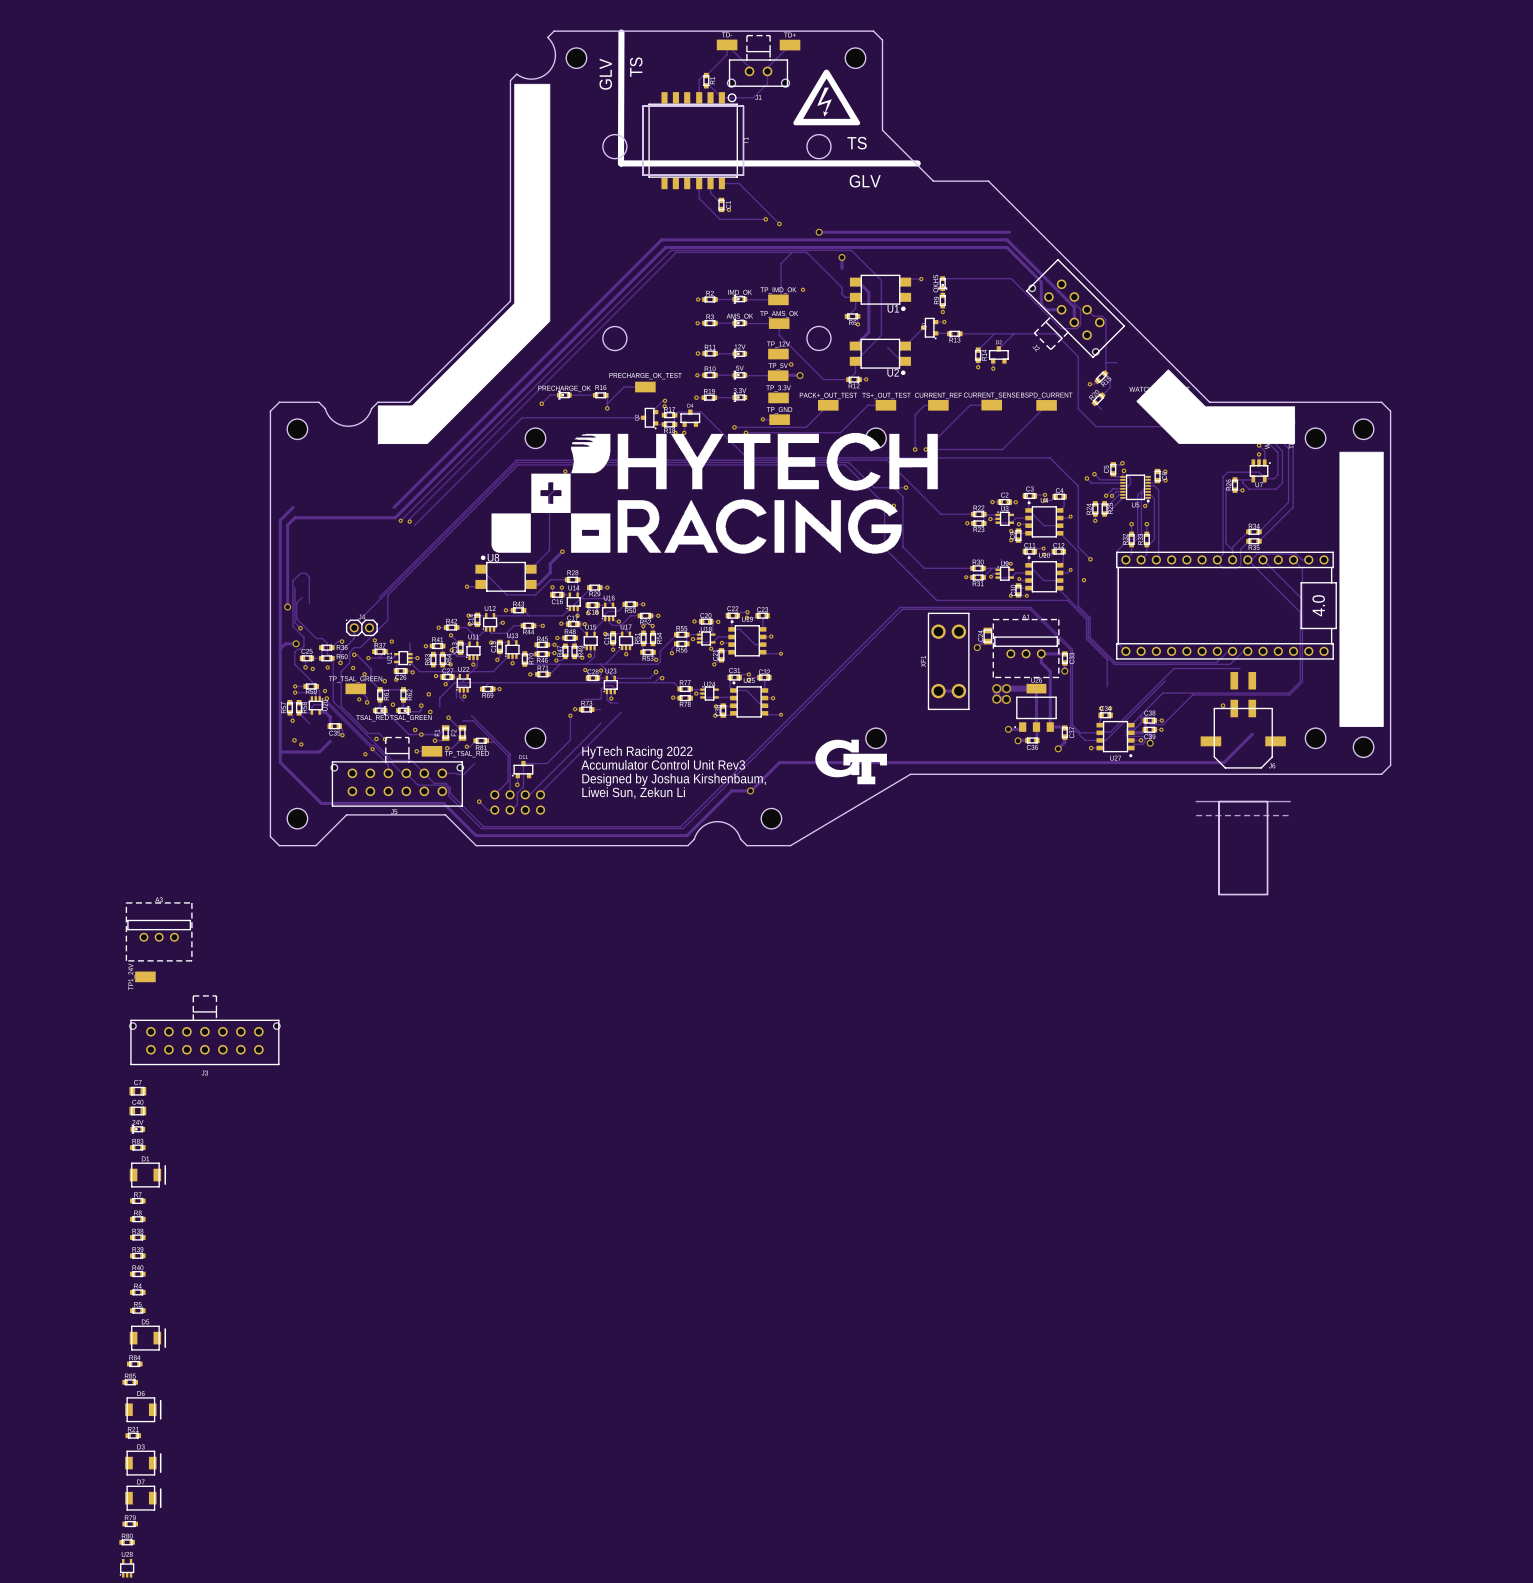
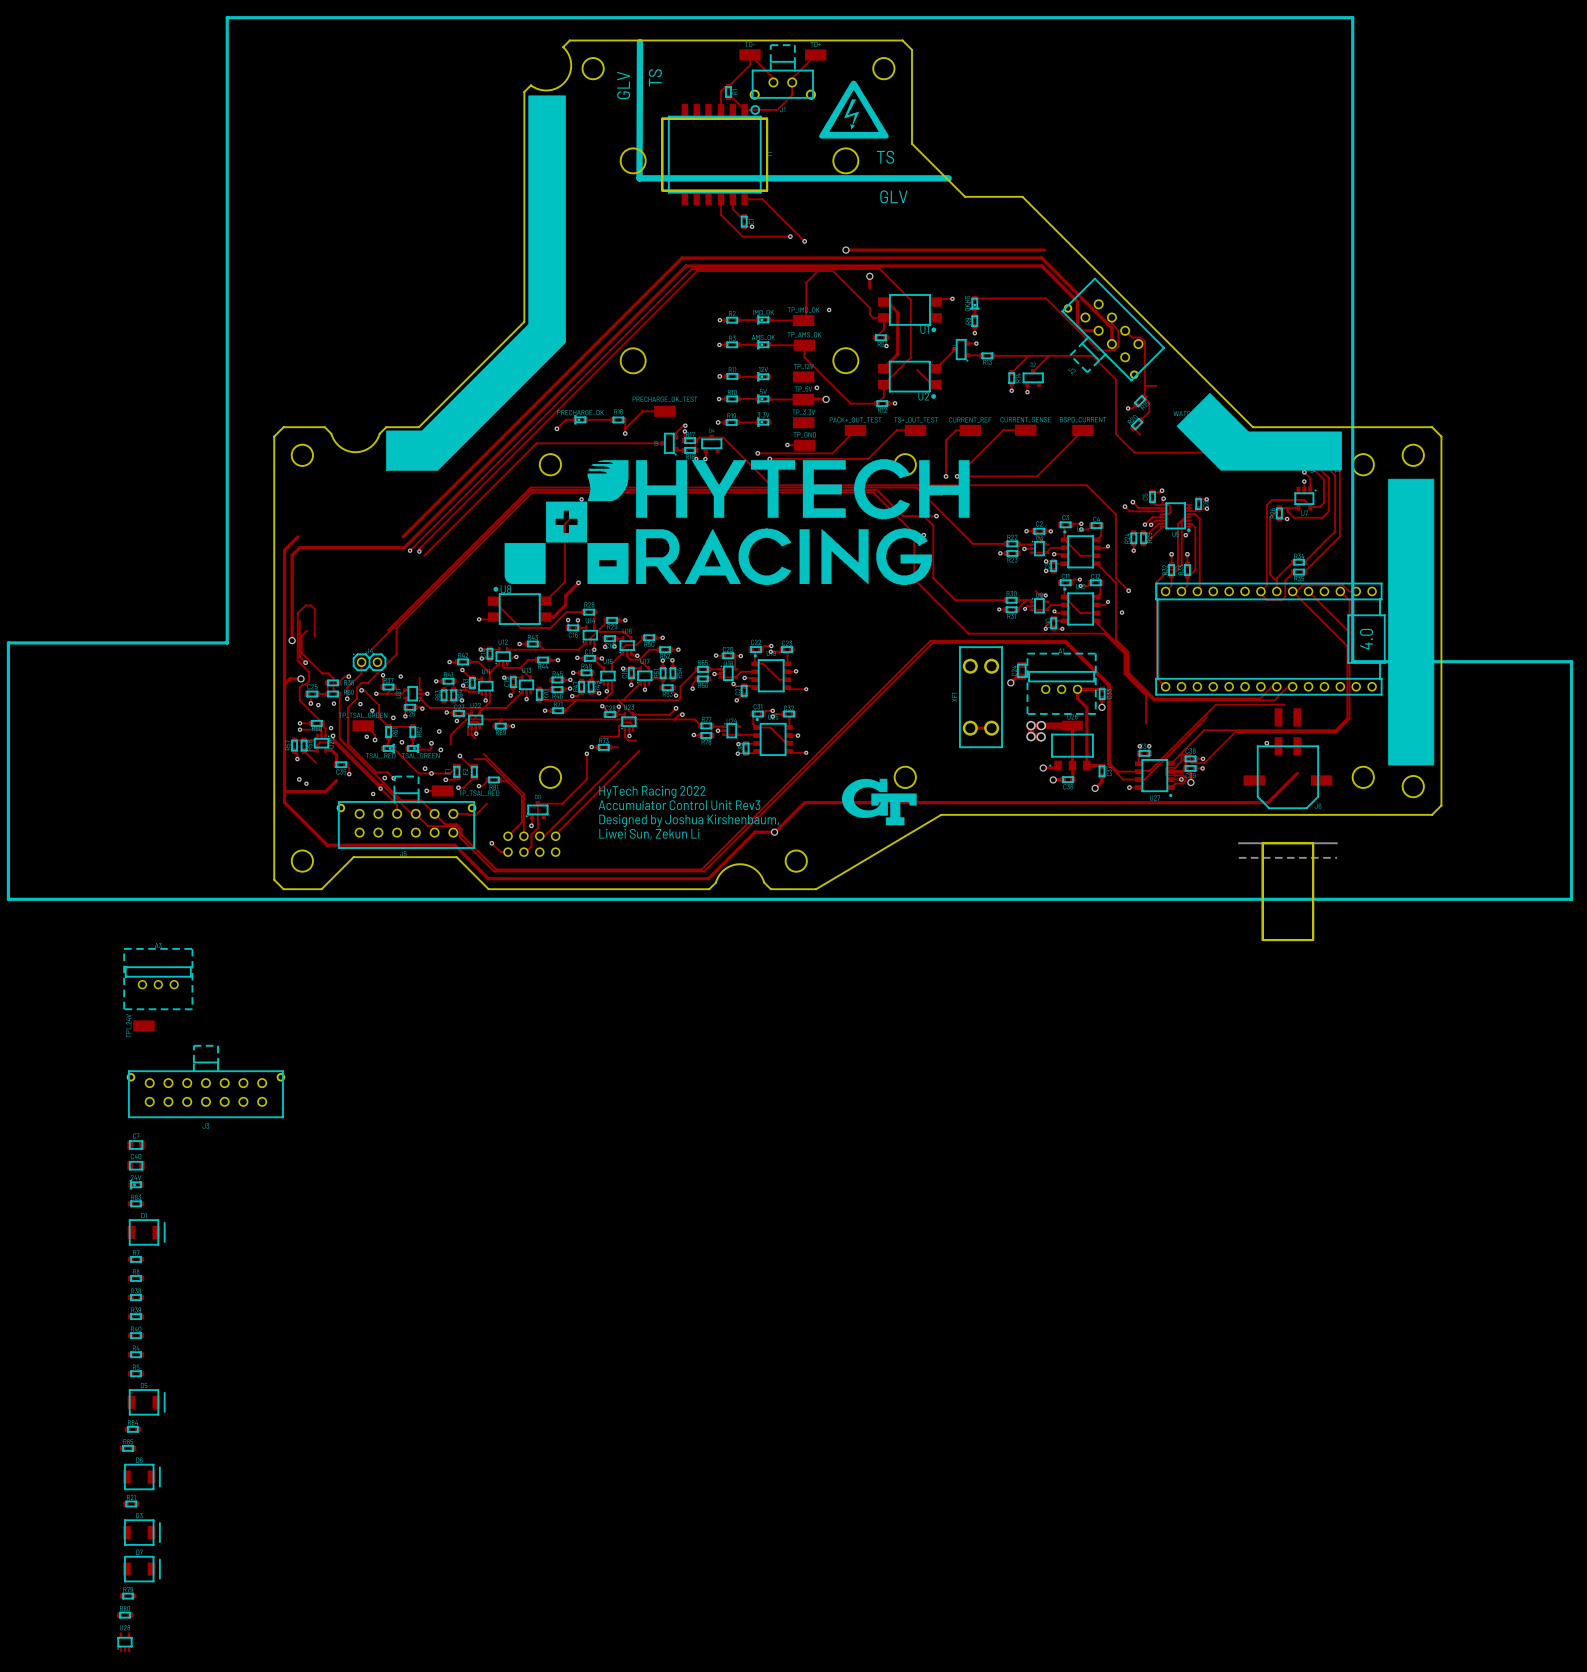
line: none -> (227, 17) (1352, 17) (1352, 661) (1571, 661) (1571, 899) (8, 899) (8, 642) (227, 642) (227, 17)

